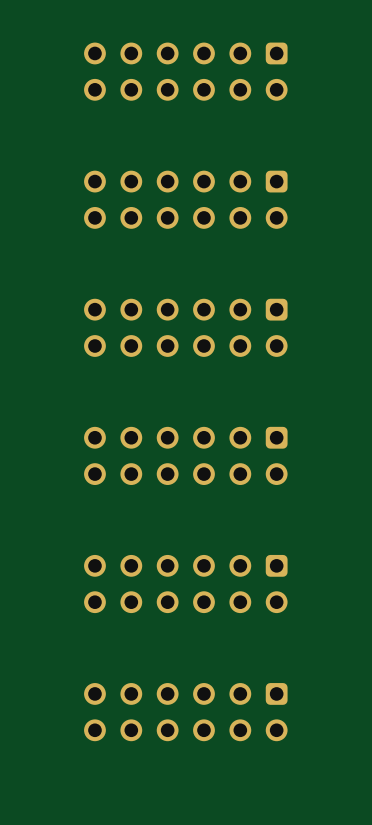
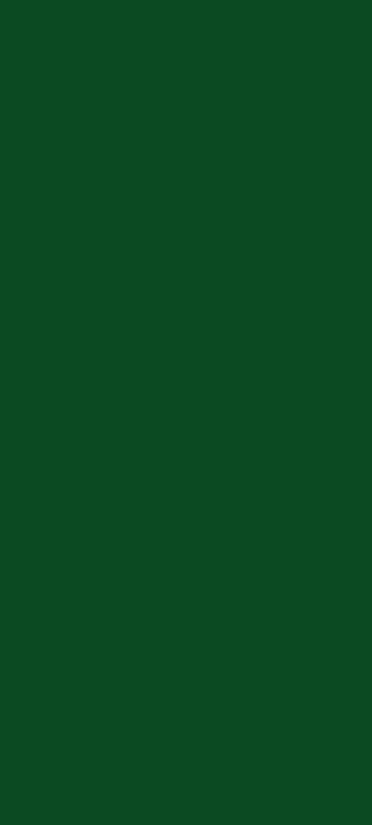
part: (185, 71) -> none
part: (185, 199) -> none
part: (185, 327) -> none
part: (185, 455) -> none
part: (185, 584) -> none
part: (185, 712) -> none

